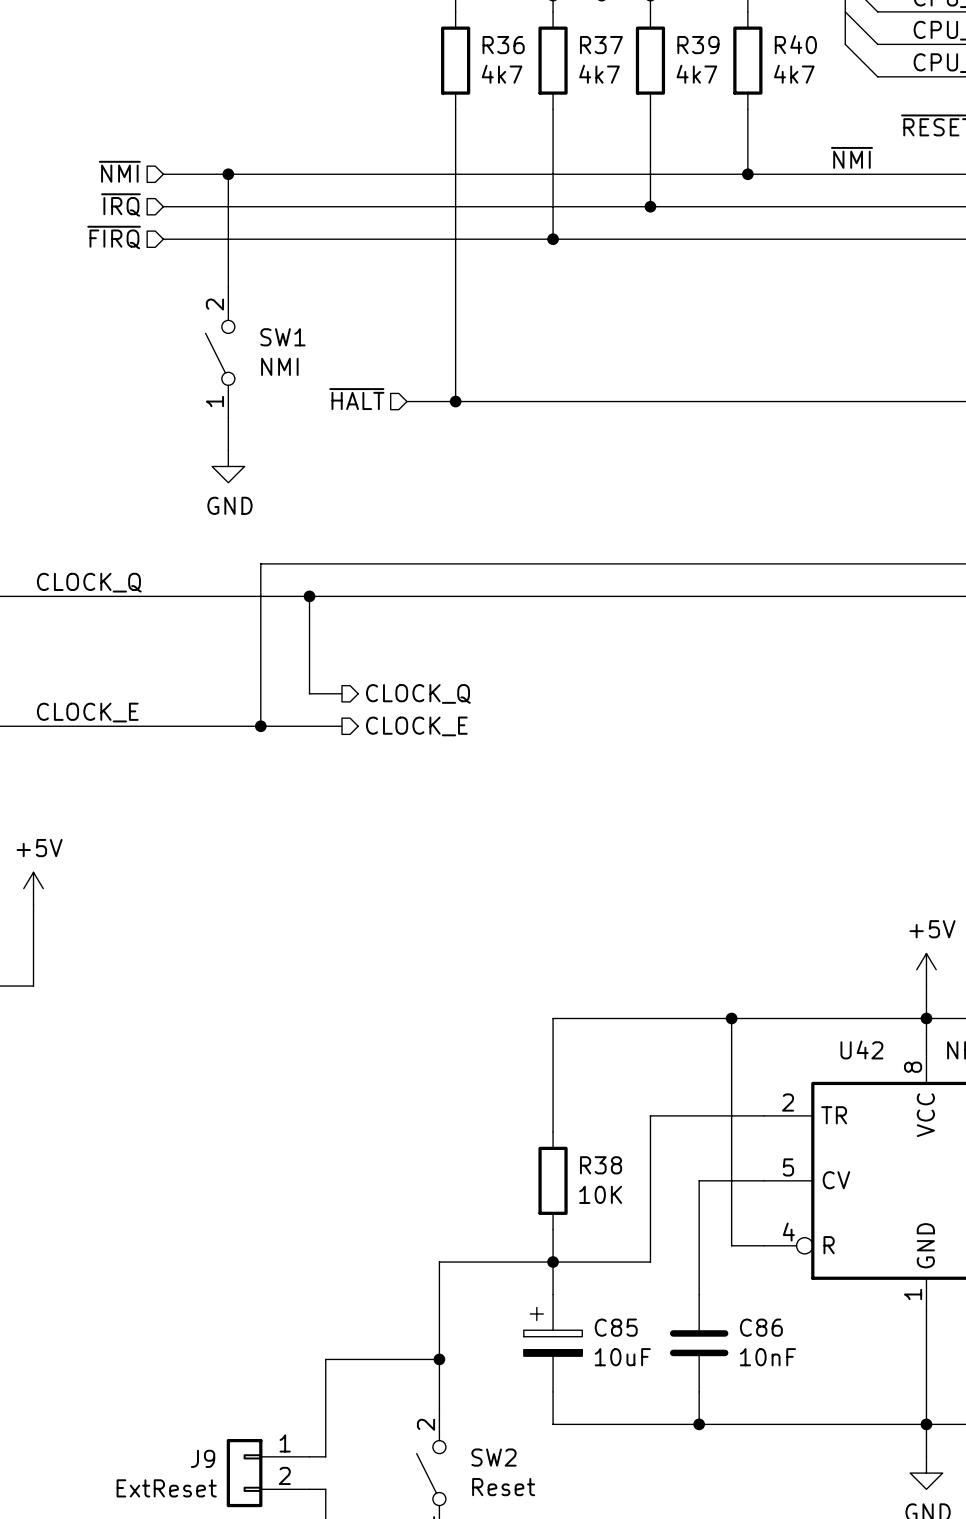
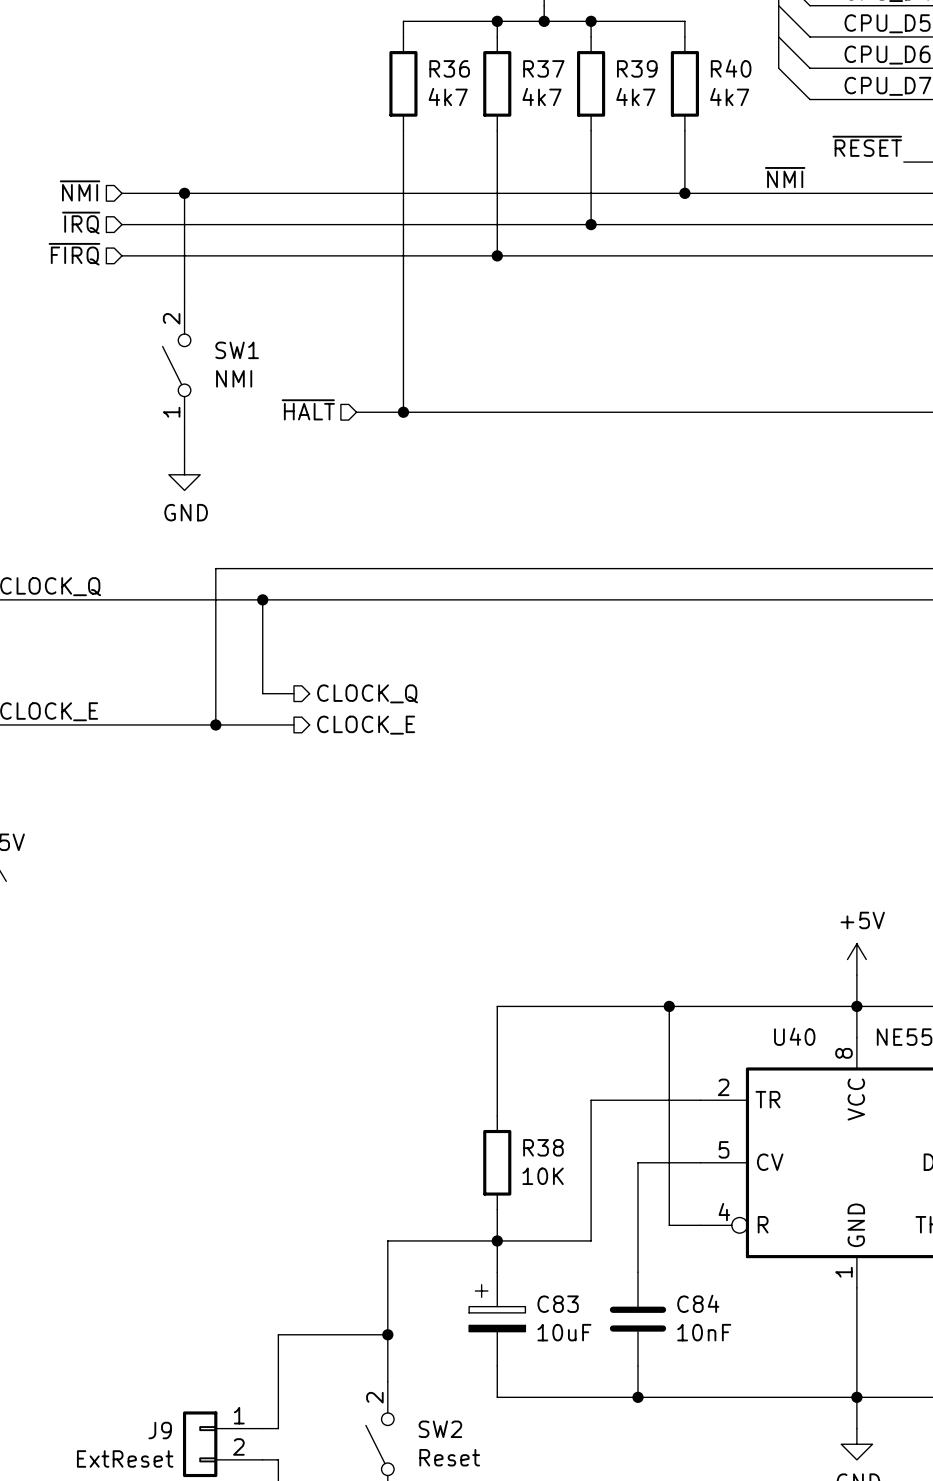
U42 name: U42 (861, 1049) -> U40 (794, 1036)
C85 name: C85 (616, 1327) -> C83 (558, 1304)
C86 name: C86 (761, 1327) -> C84 (698, 1303)

